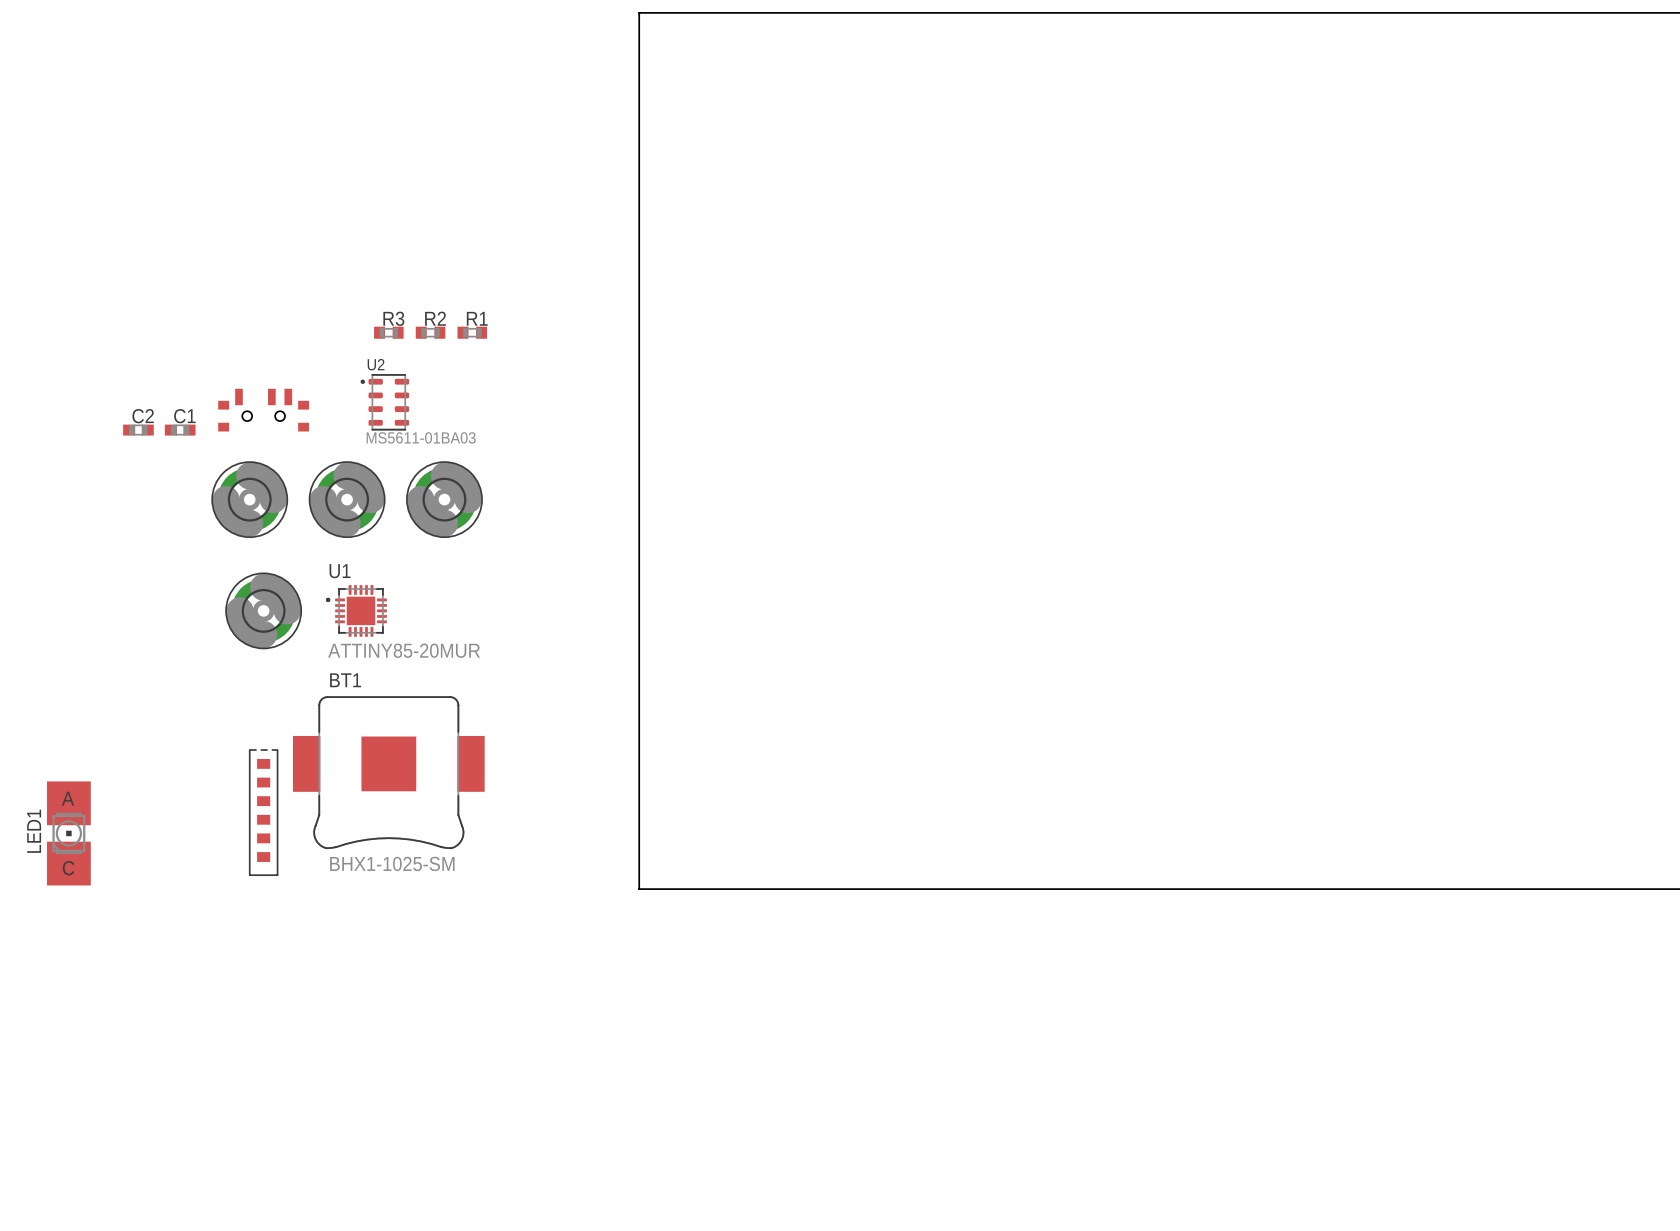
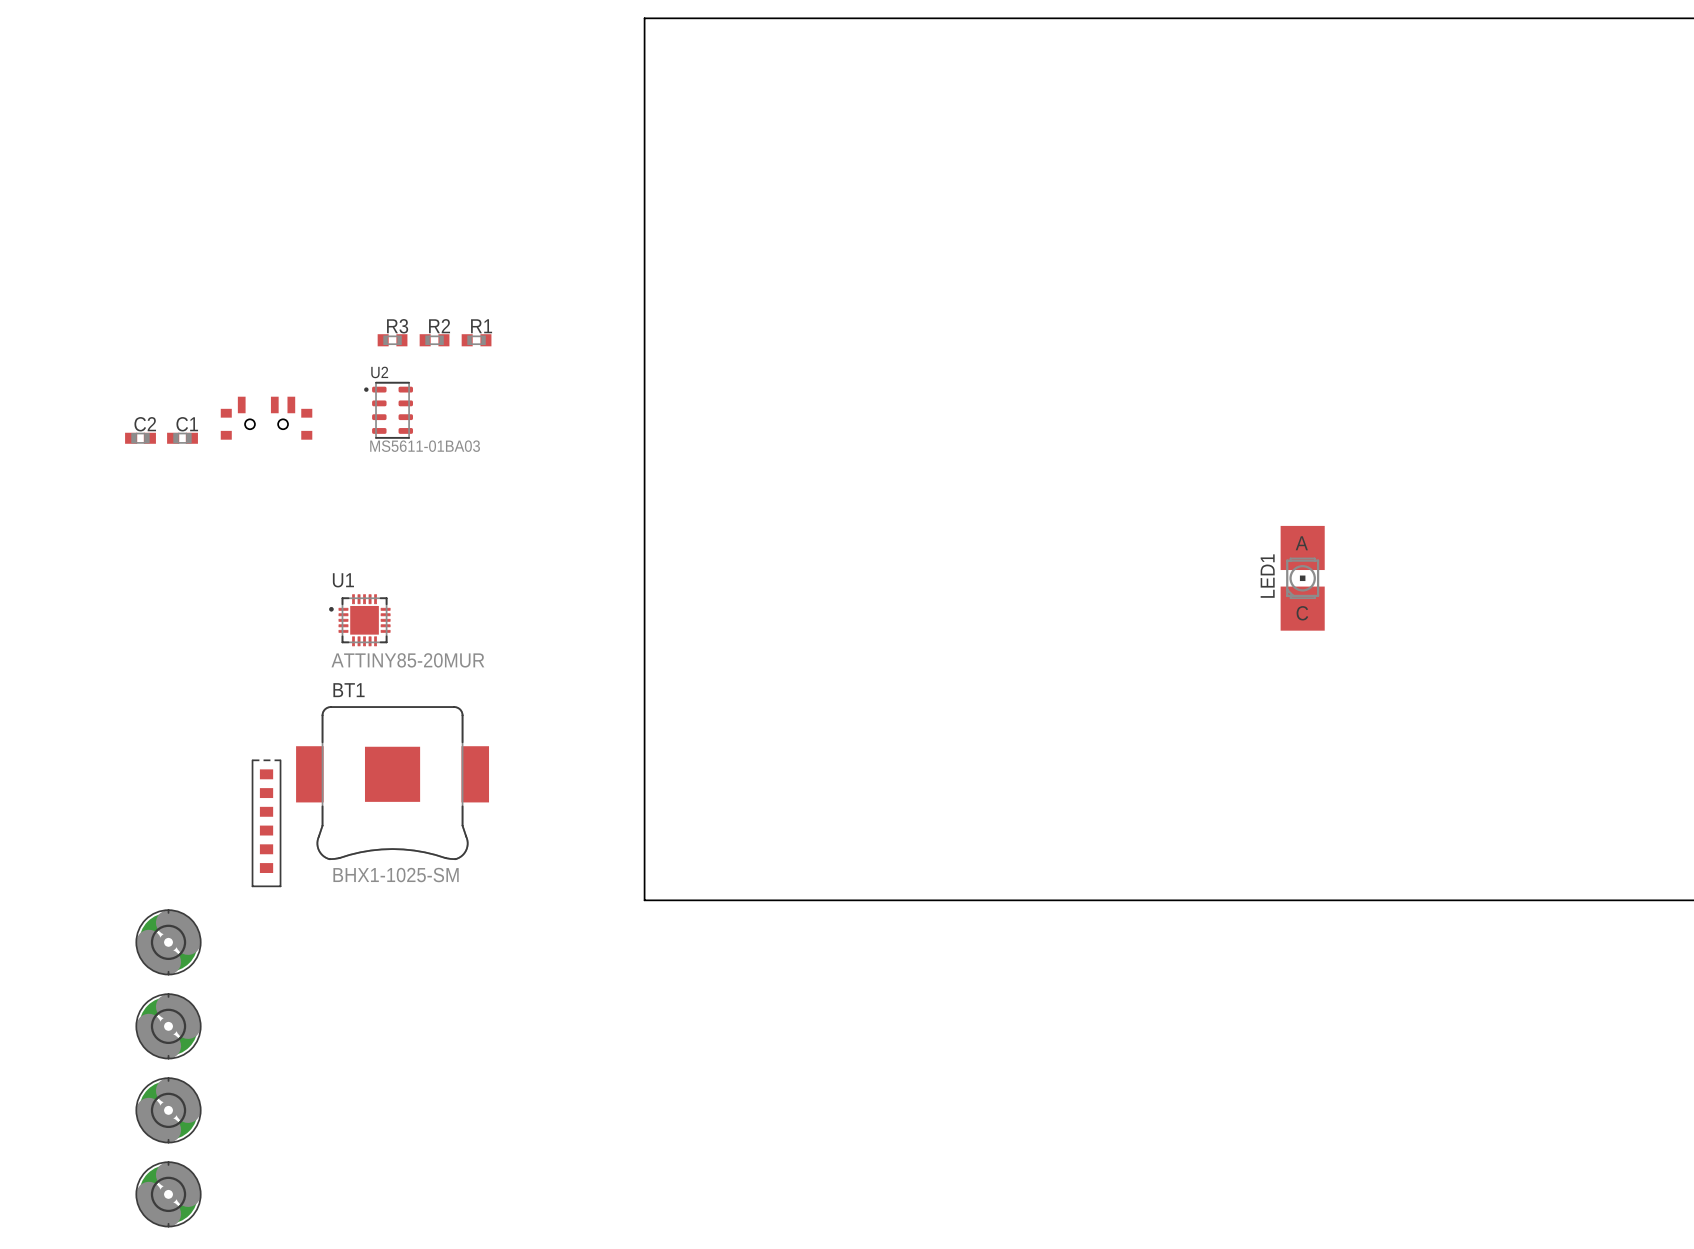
part: (249, 499) -> none
part: (347, 499) -> none
part: (444, 499) -> none
part: (263, 610) -> none
LED1 position: (68, 833) -> (1302, 578)
part: none -> (168, 942)
part: none -> (168, 1026)
part: none -> (168, 1110)
part: none -> (168, 1194)

